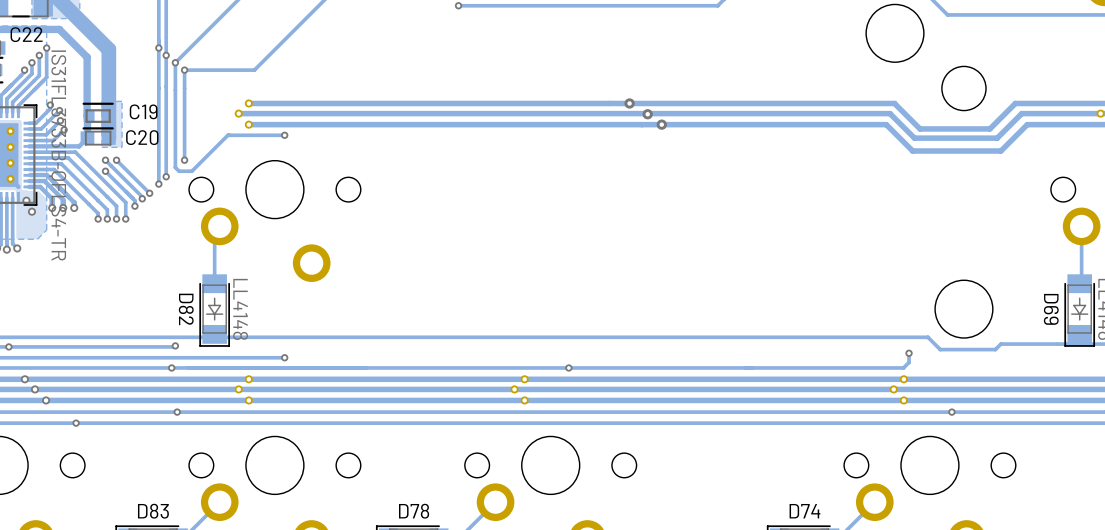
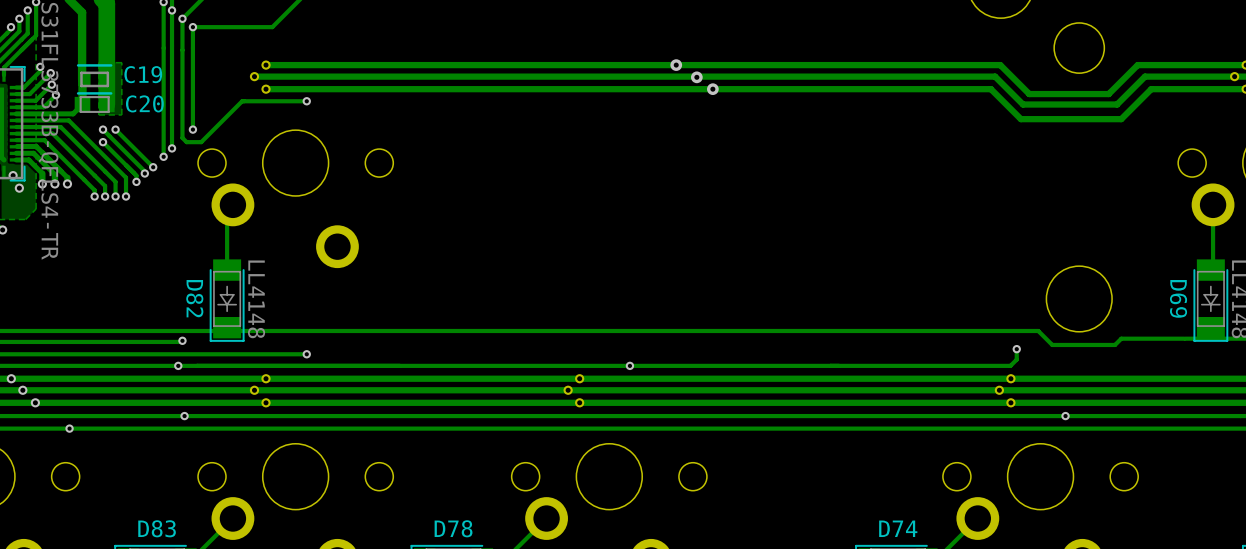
via: none -> (676, 65)
via: (629, 103) -> none
via: none -> (696, 77)
via: (647, 114) -> none
via: none -> (712, 89)
via: (661, 124) -> none

